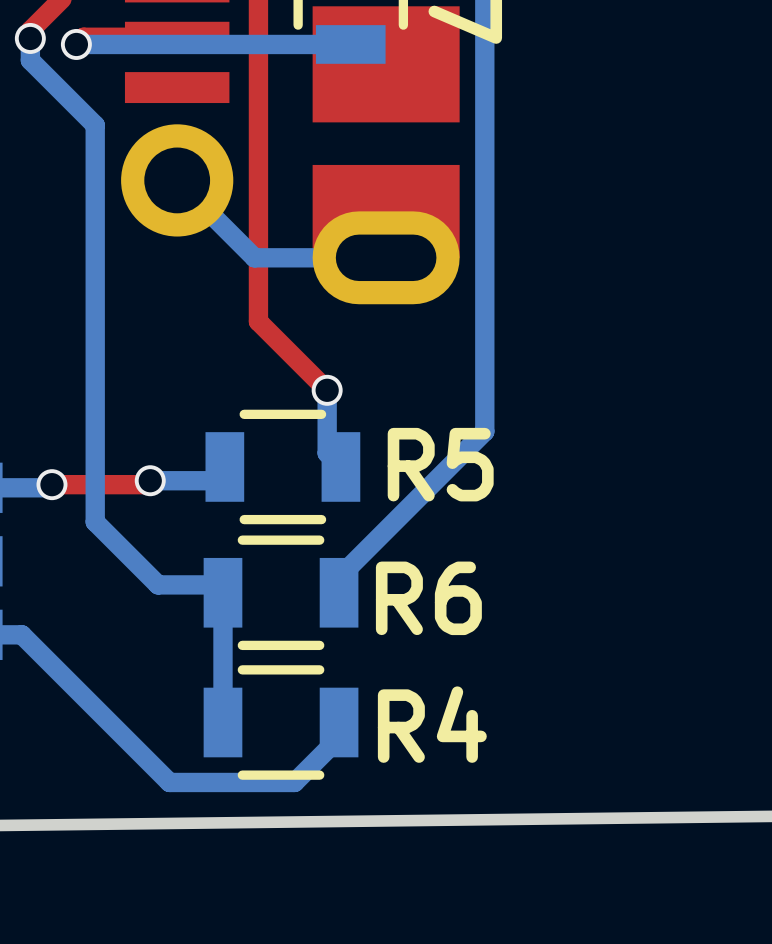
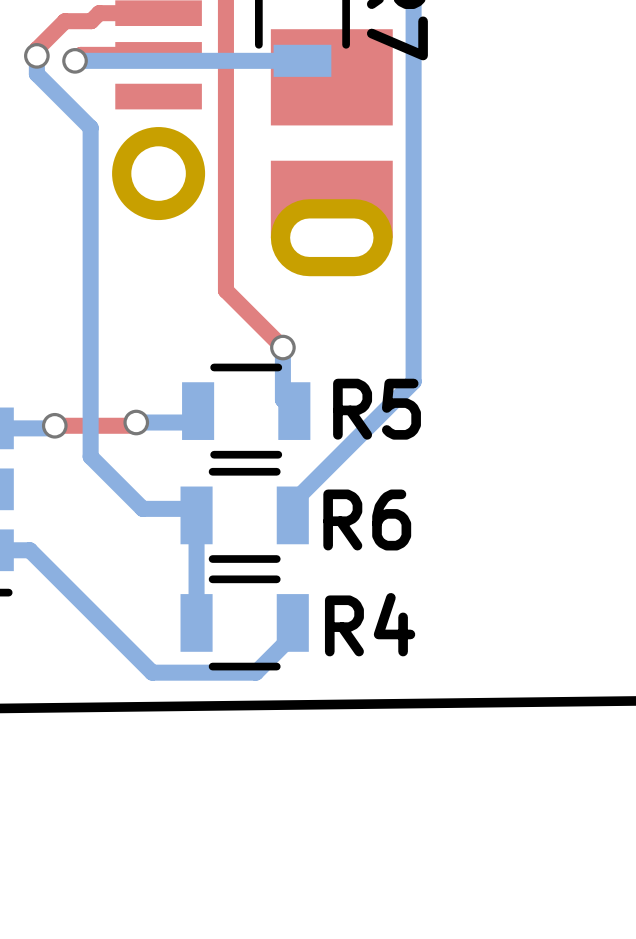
bottom track: (177, 180) (254, 257) (386, 257) -> none

